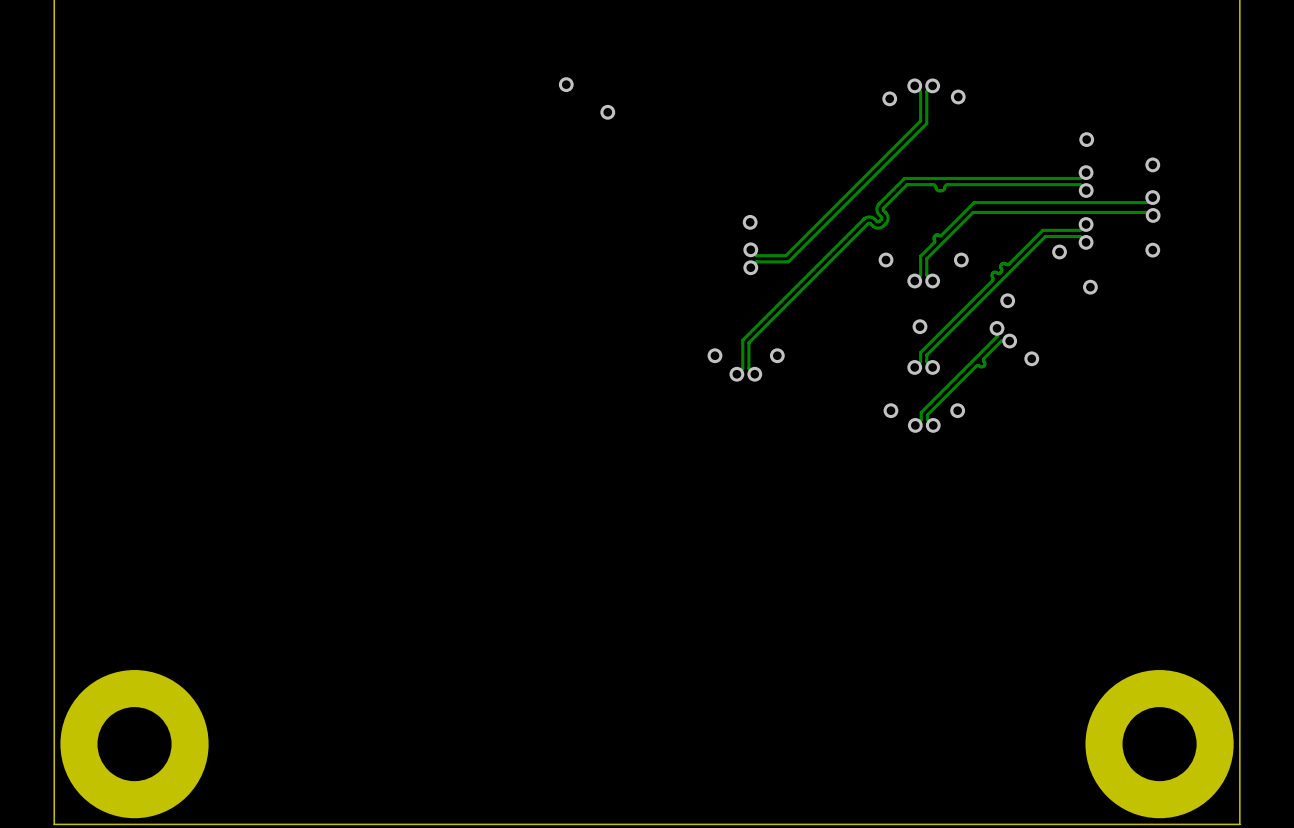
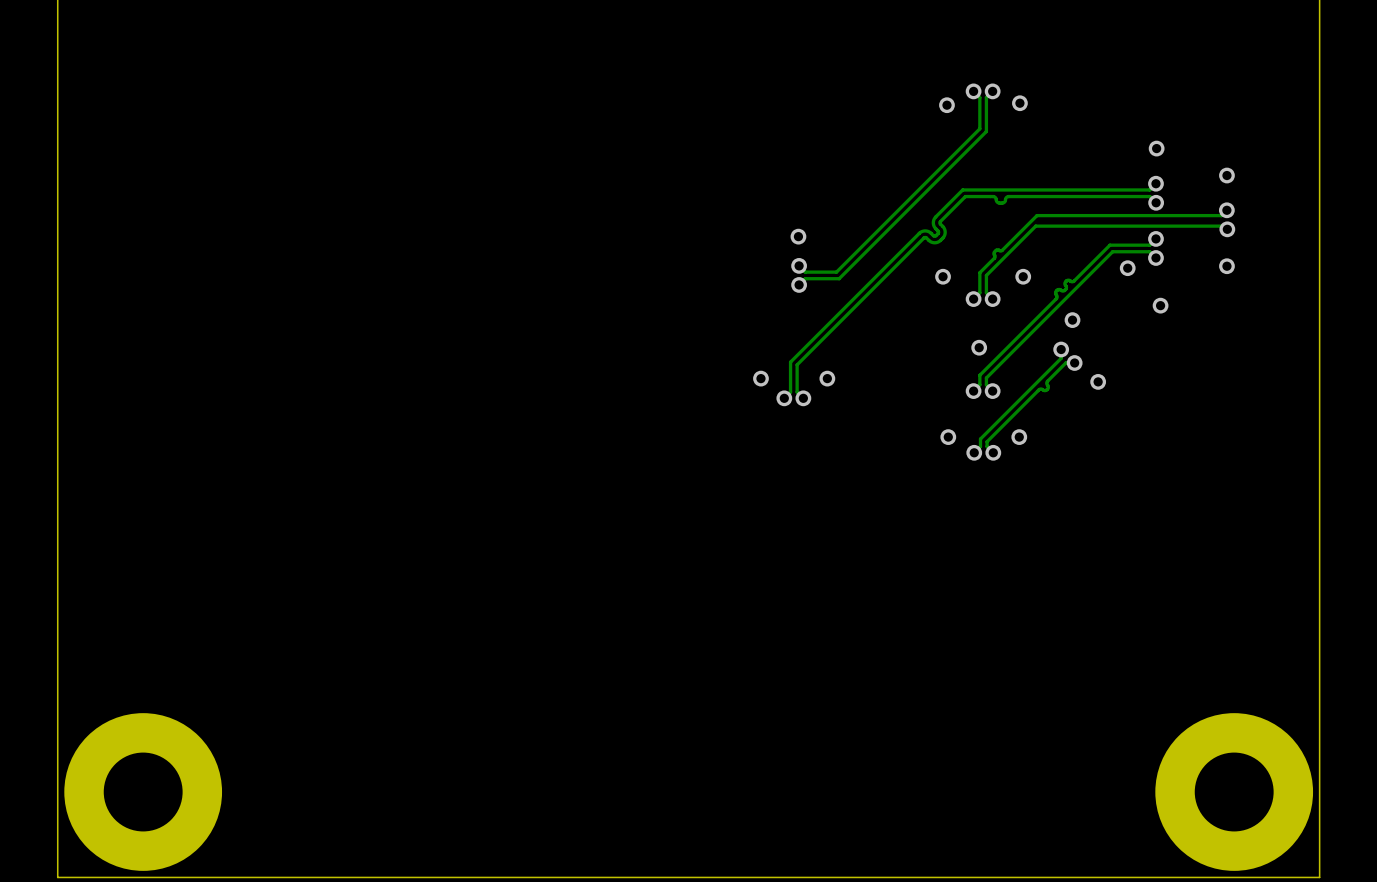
via: (566, 84) -> none
via: (607, 112) -> none

